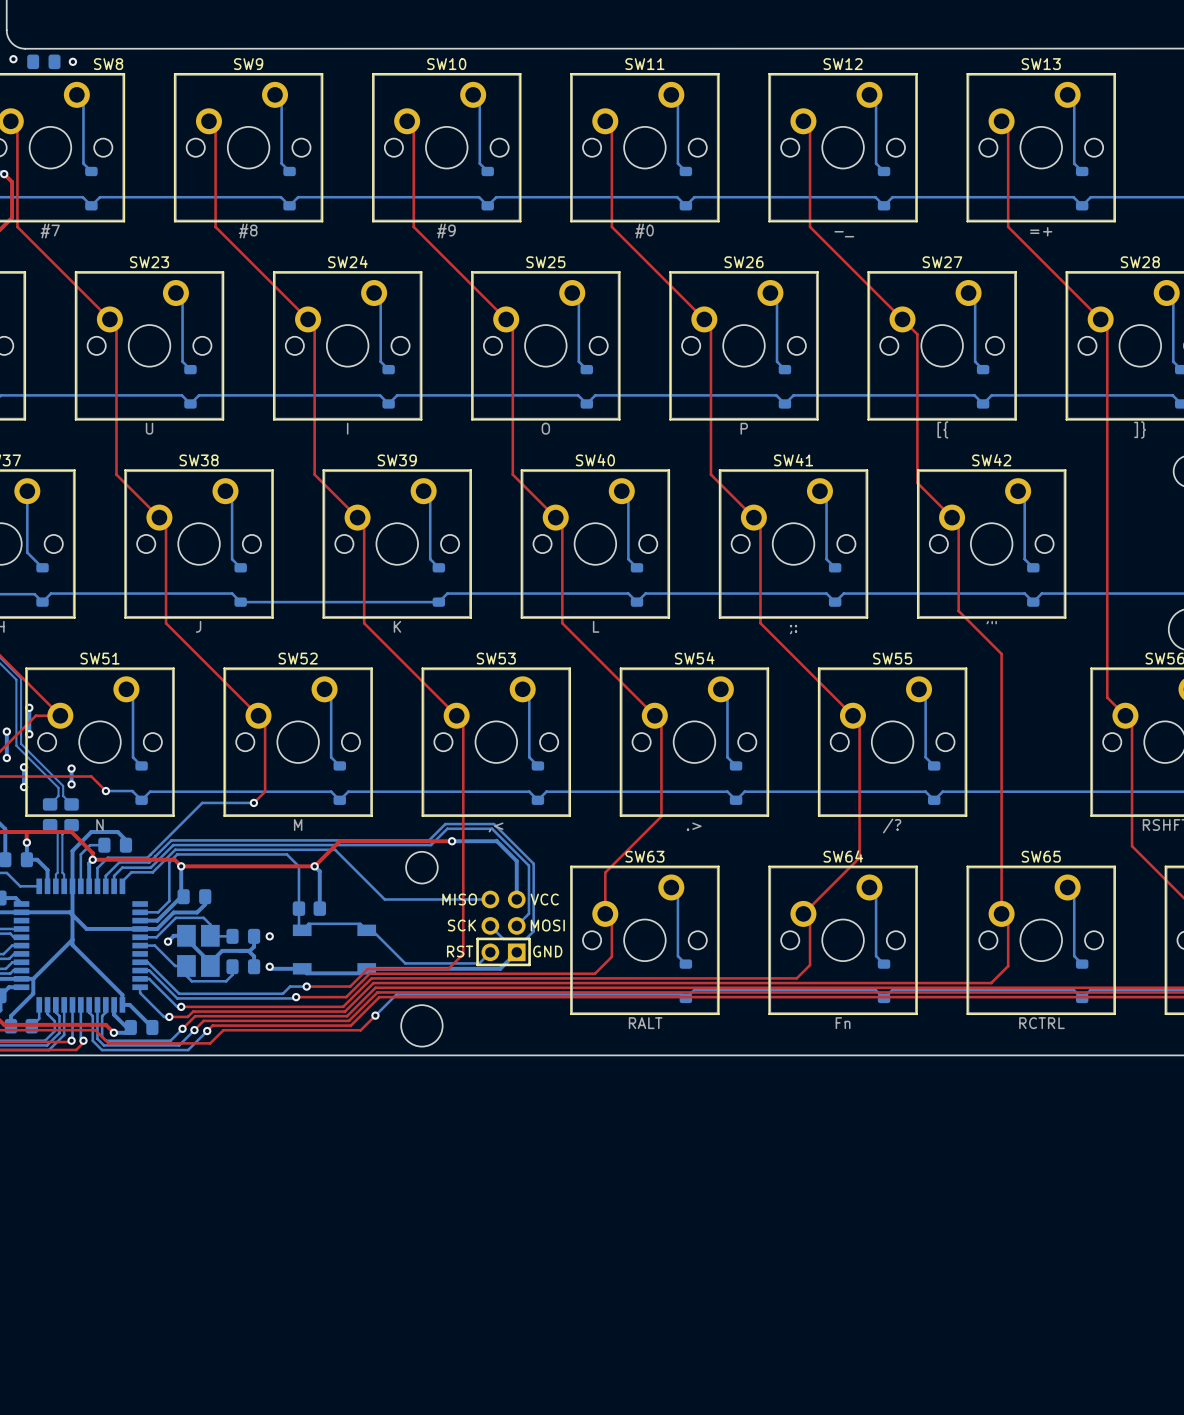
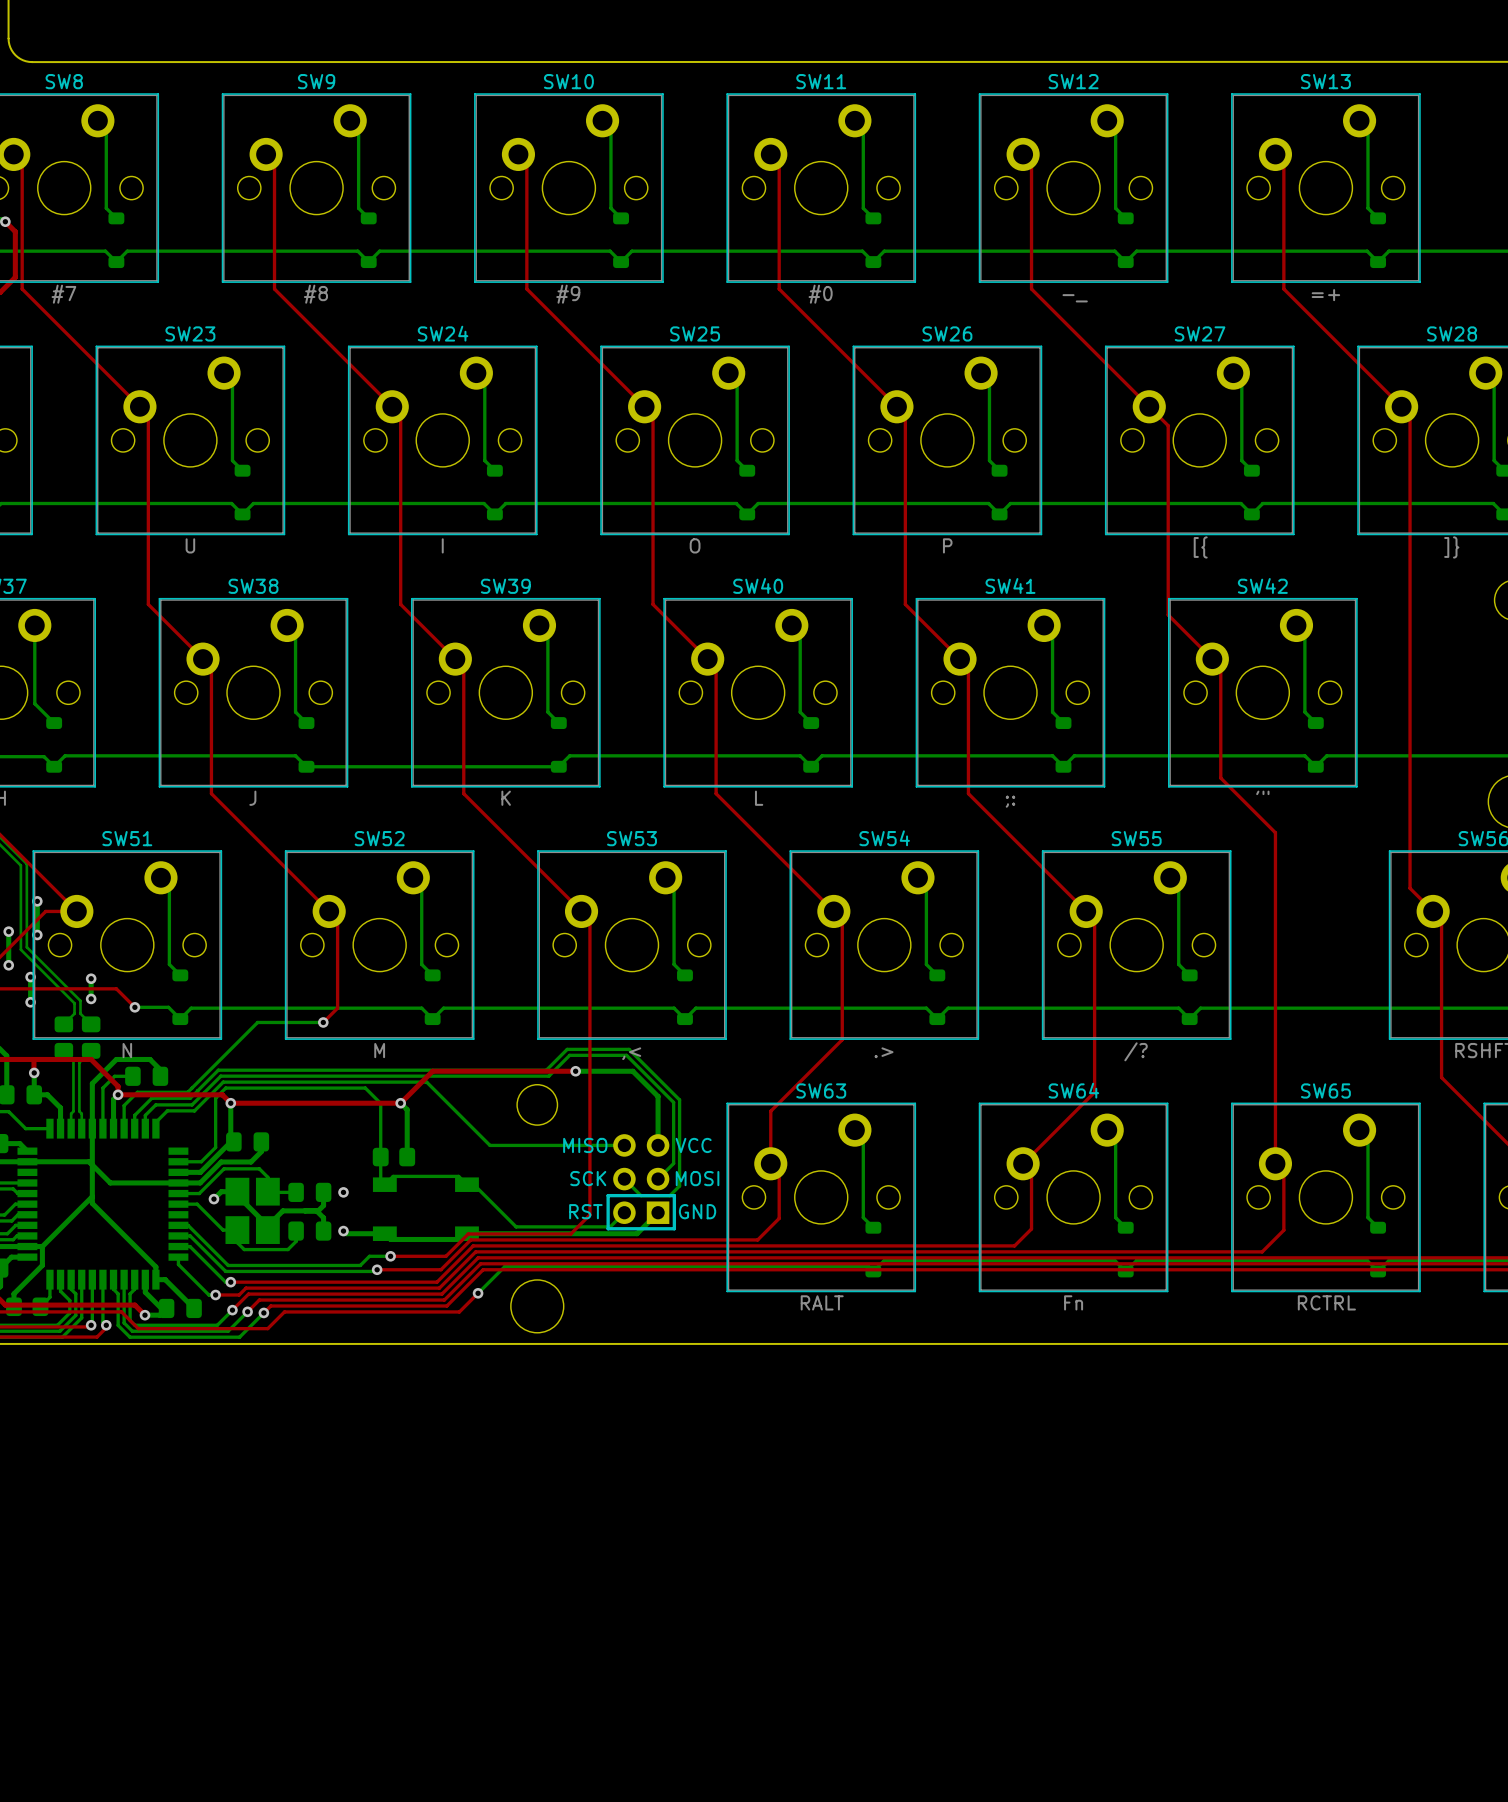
via: (13, 59) -> none
part: (43, 61) -> none
via: (72, 61) -> none
SW8 name position: SW8 (108, 64) -> SW8 (64, 81)

